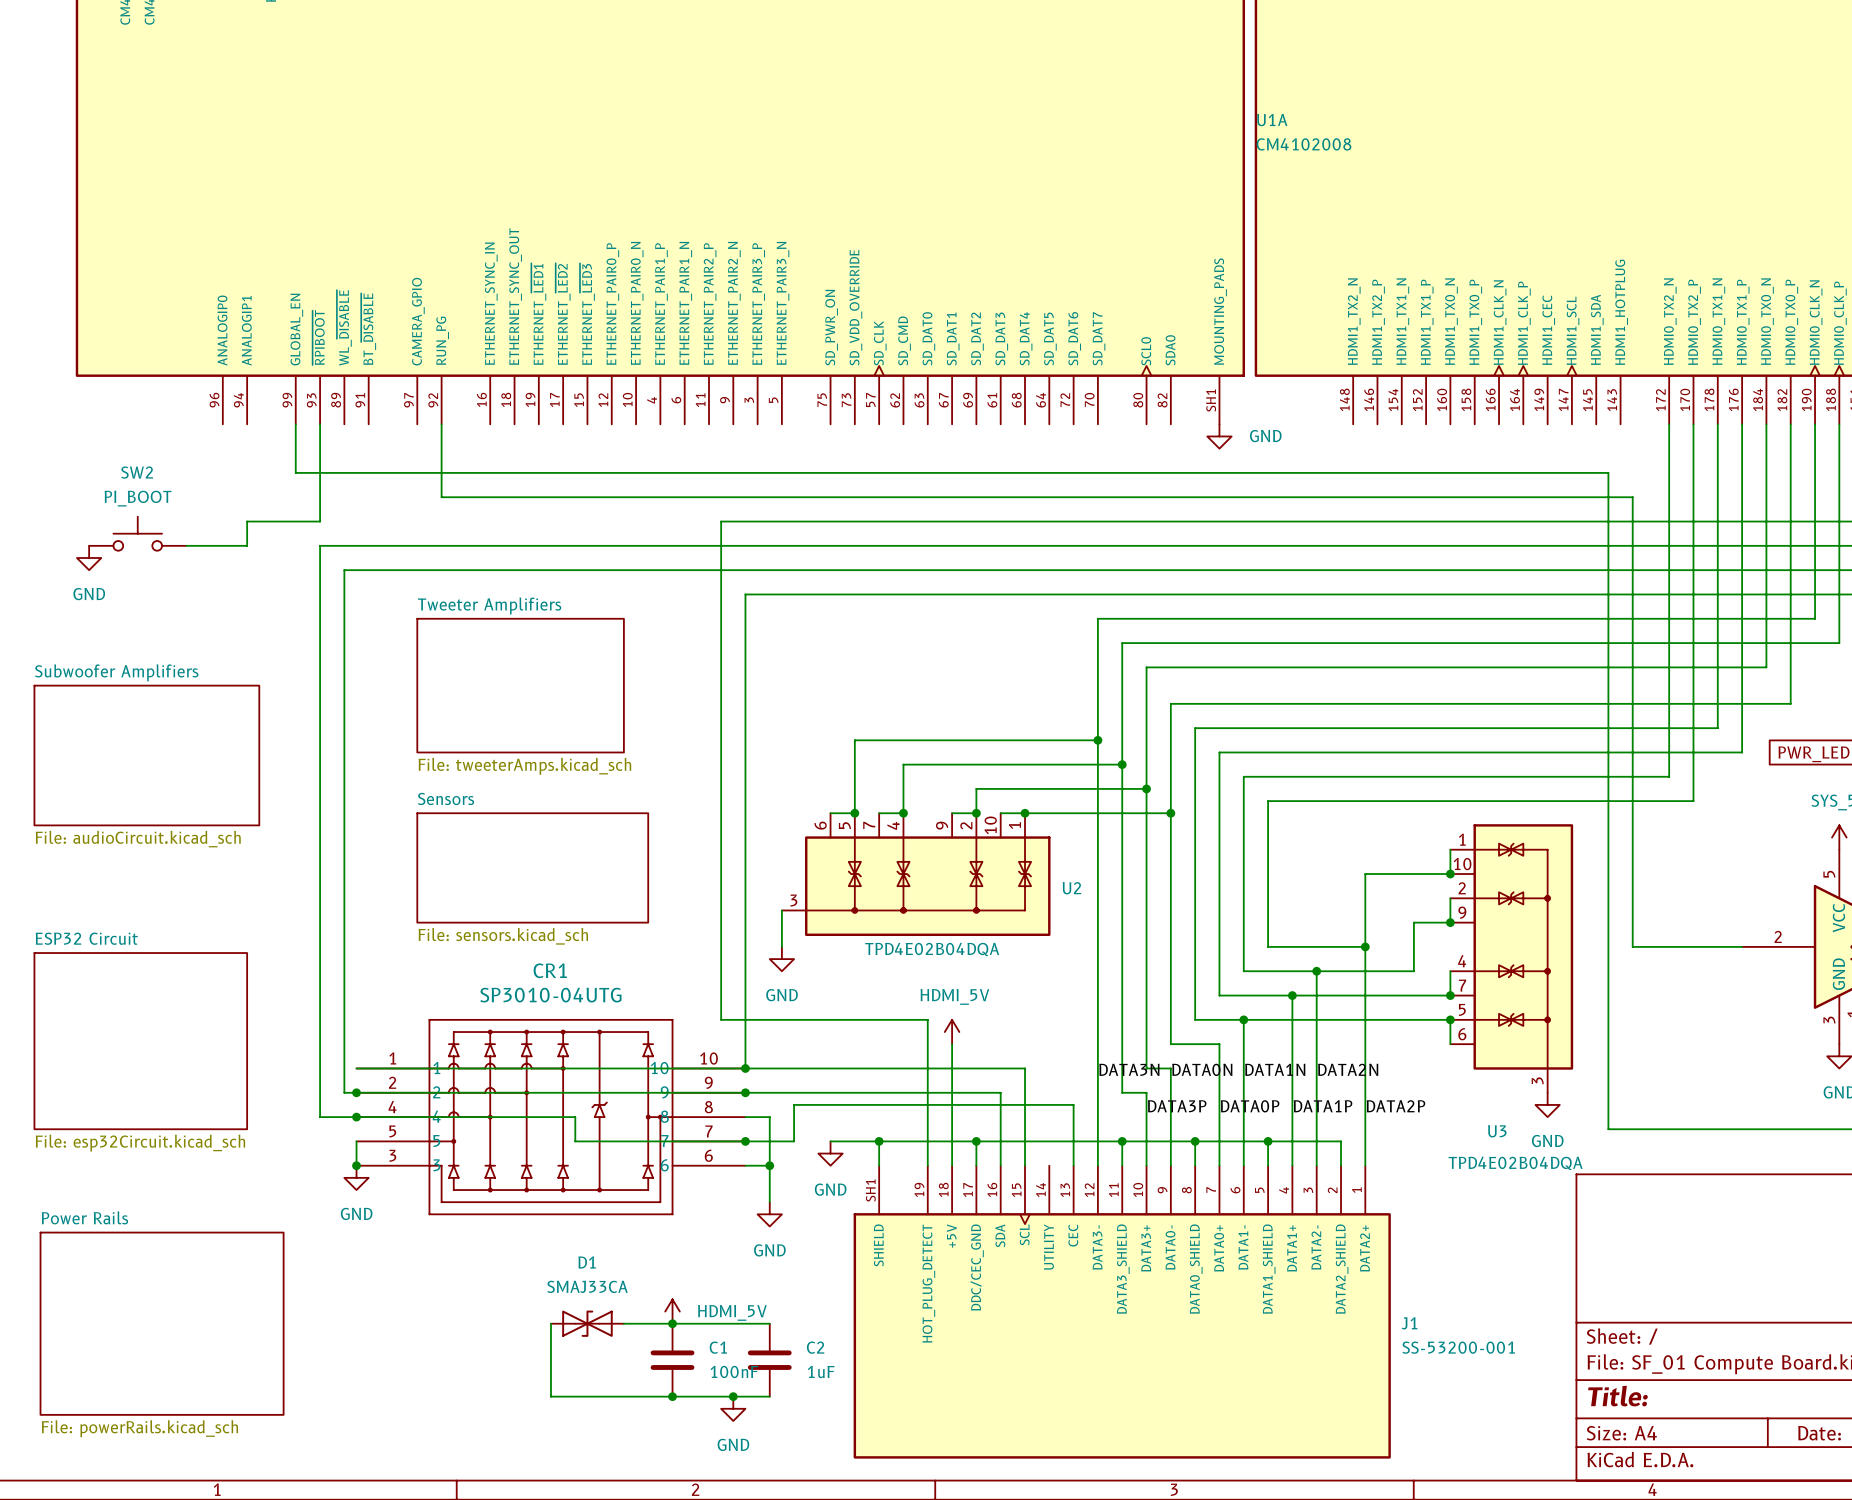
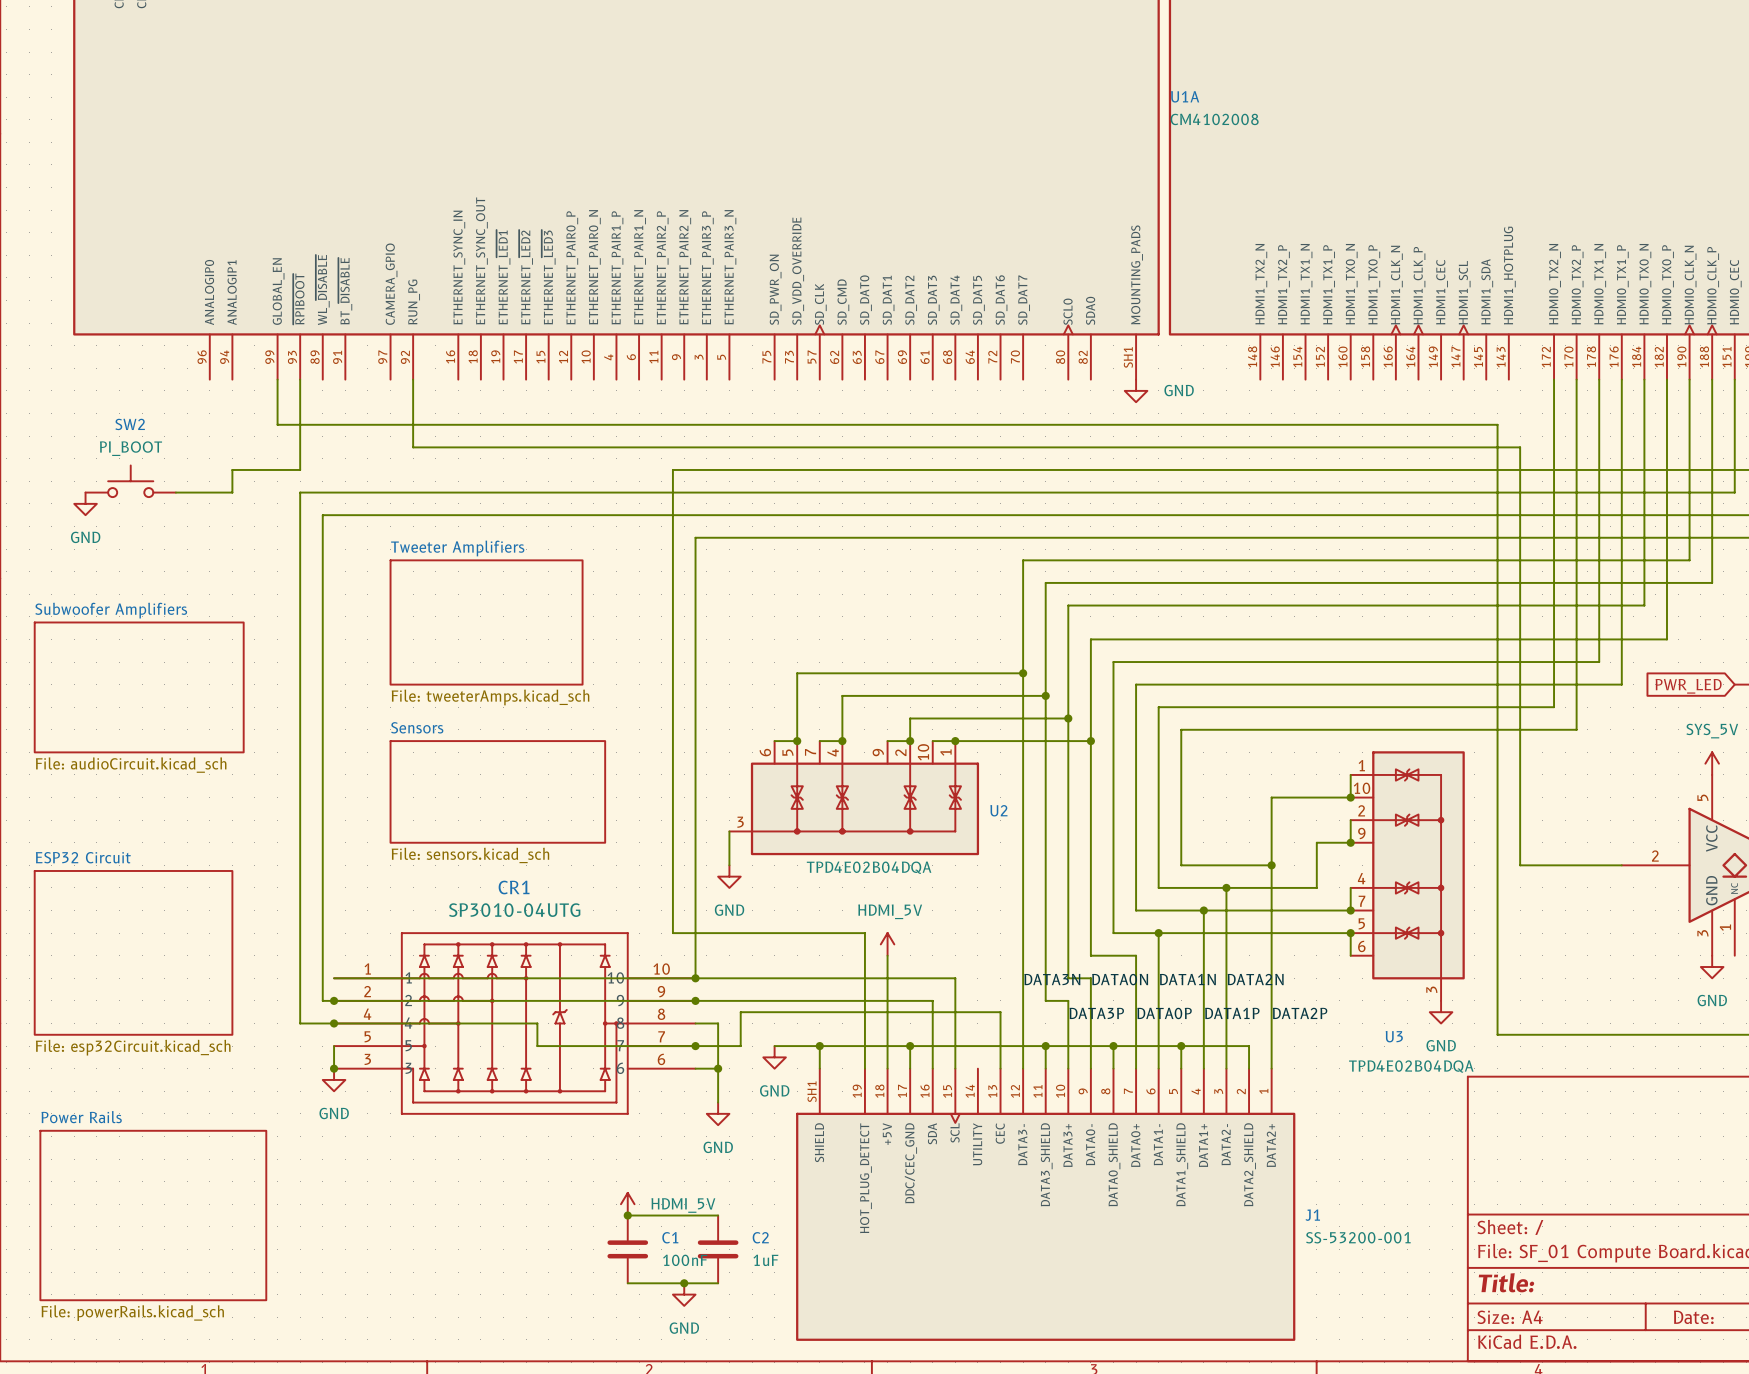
wire: (550, 1323) (550, 1396) (672, 1396) -> none
D1: SMAJ33CA (587, 1323) -> none
wire: (623, 1323) (672, 1323) -> none
junction: (672, 1396) -> none

